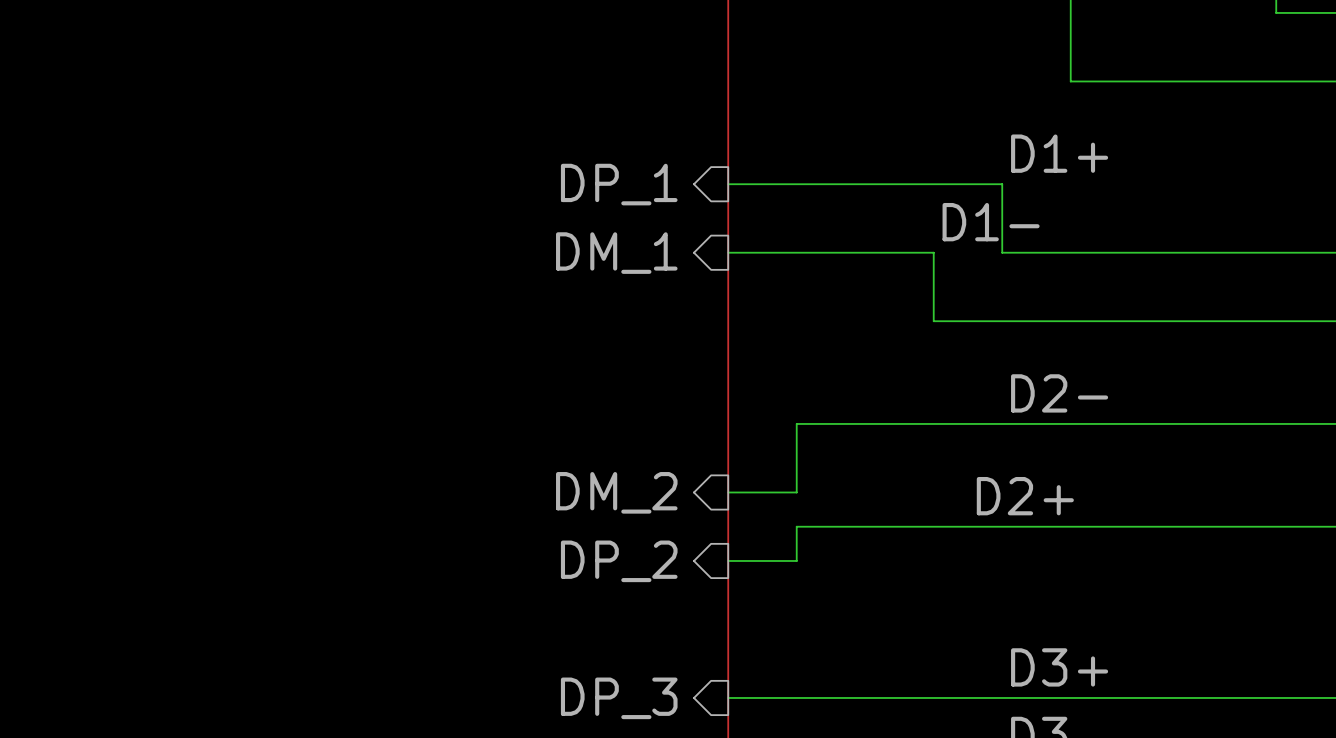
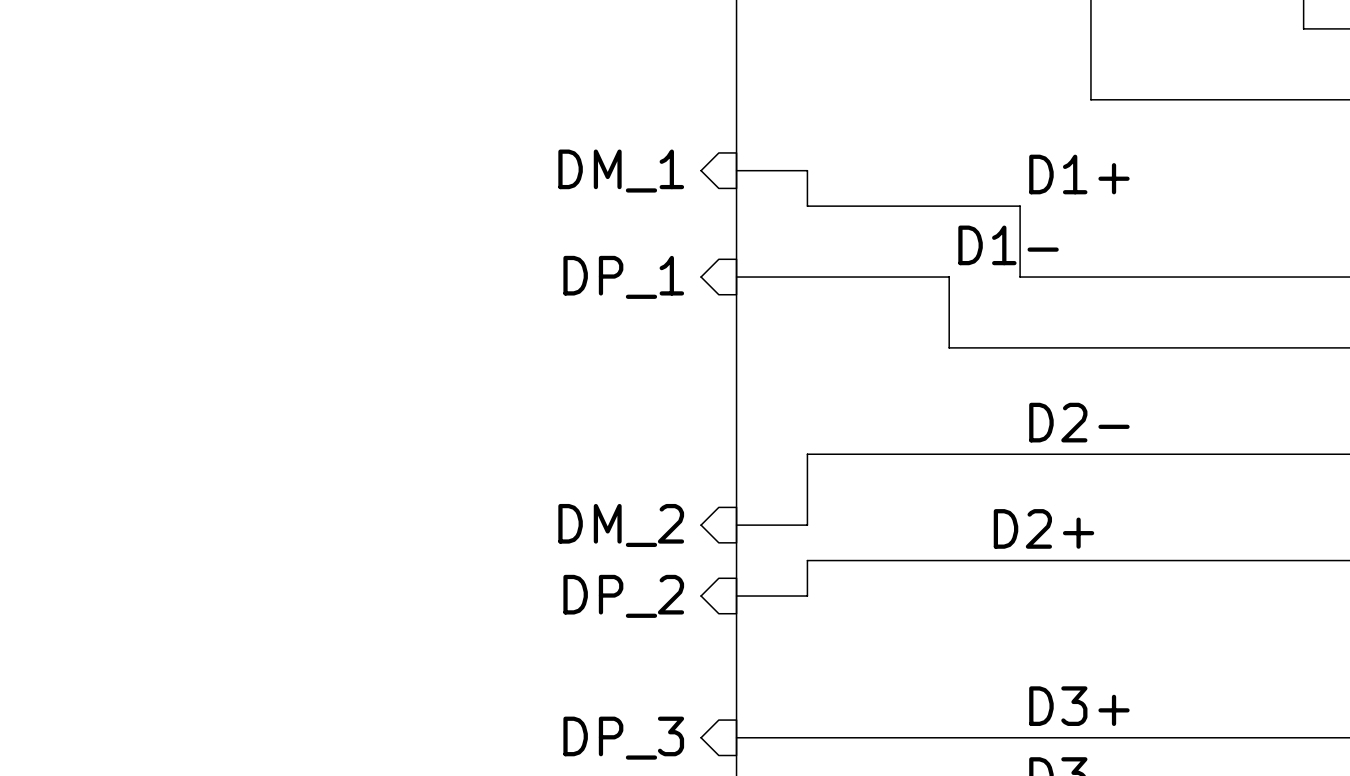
sheet pin: DP_1 (619, 184) -> DM_1 (621, 171)
wire: (728, 184) (796, 184) -> (736, 170) (807, 170) (807, 206)
sheet pin: DM_1 (616, 253) -> DP_1 (623, 277)

